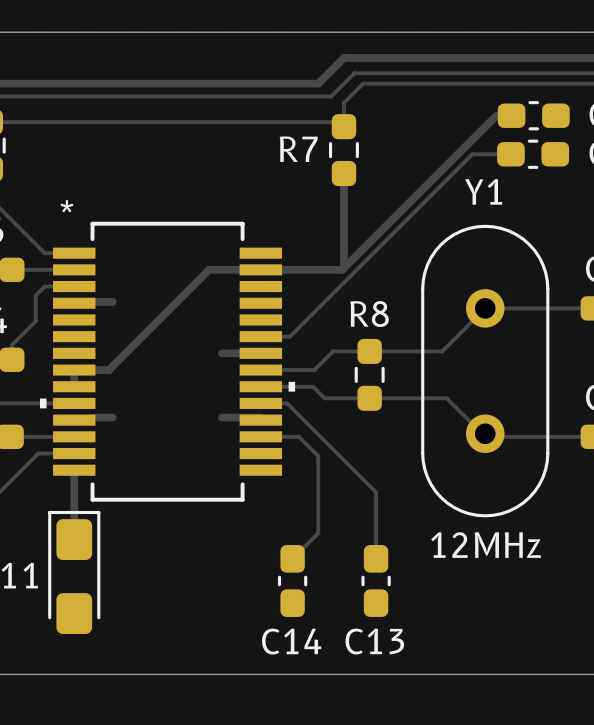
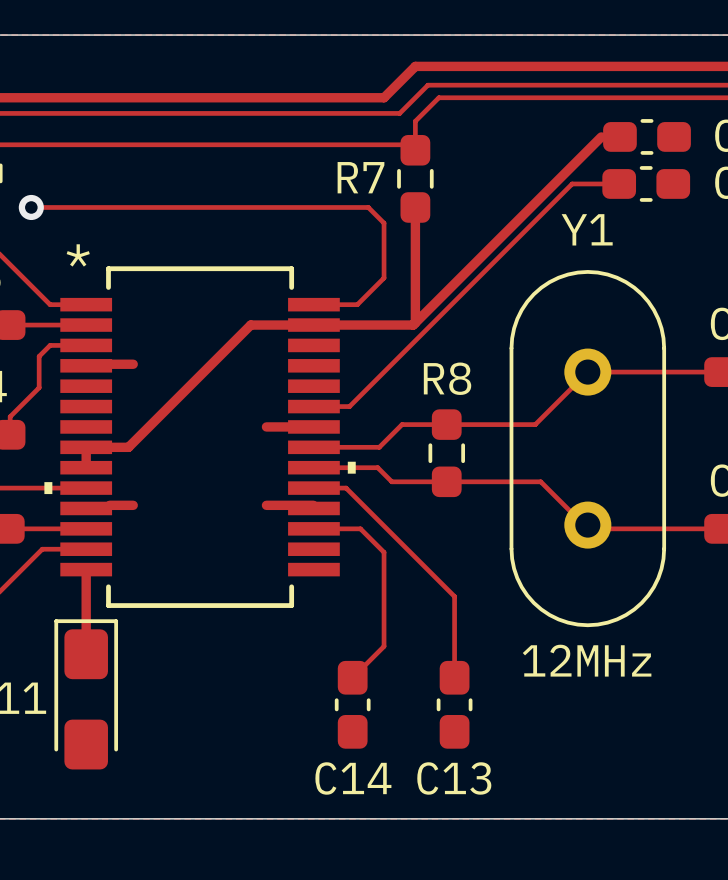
track: none -> (31, 207) (368, 207) (384, 223) (384, 278) (357, 304) (313, 304)
via: none -> (31, 207)

